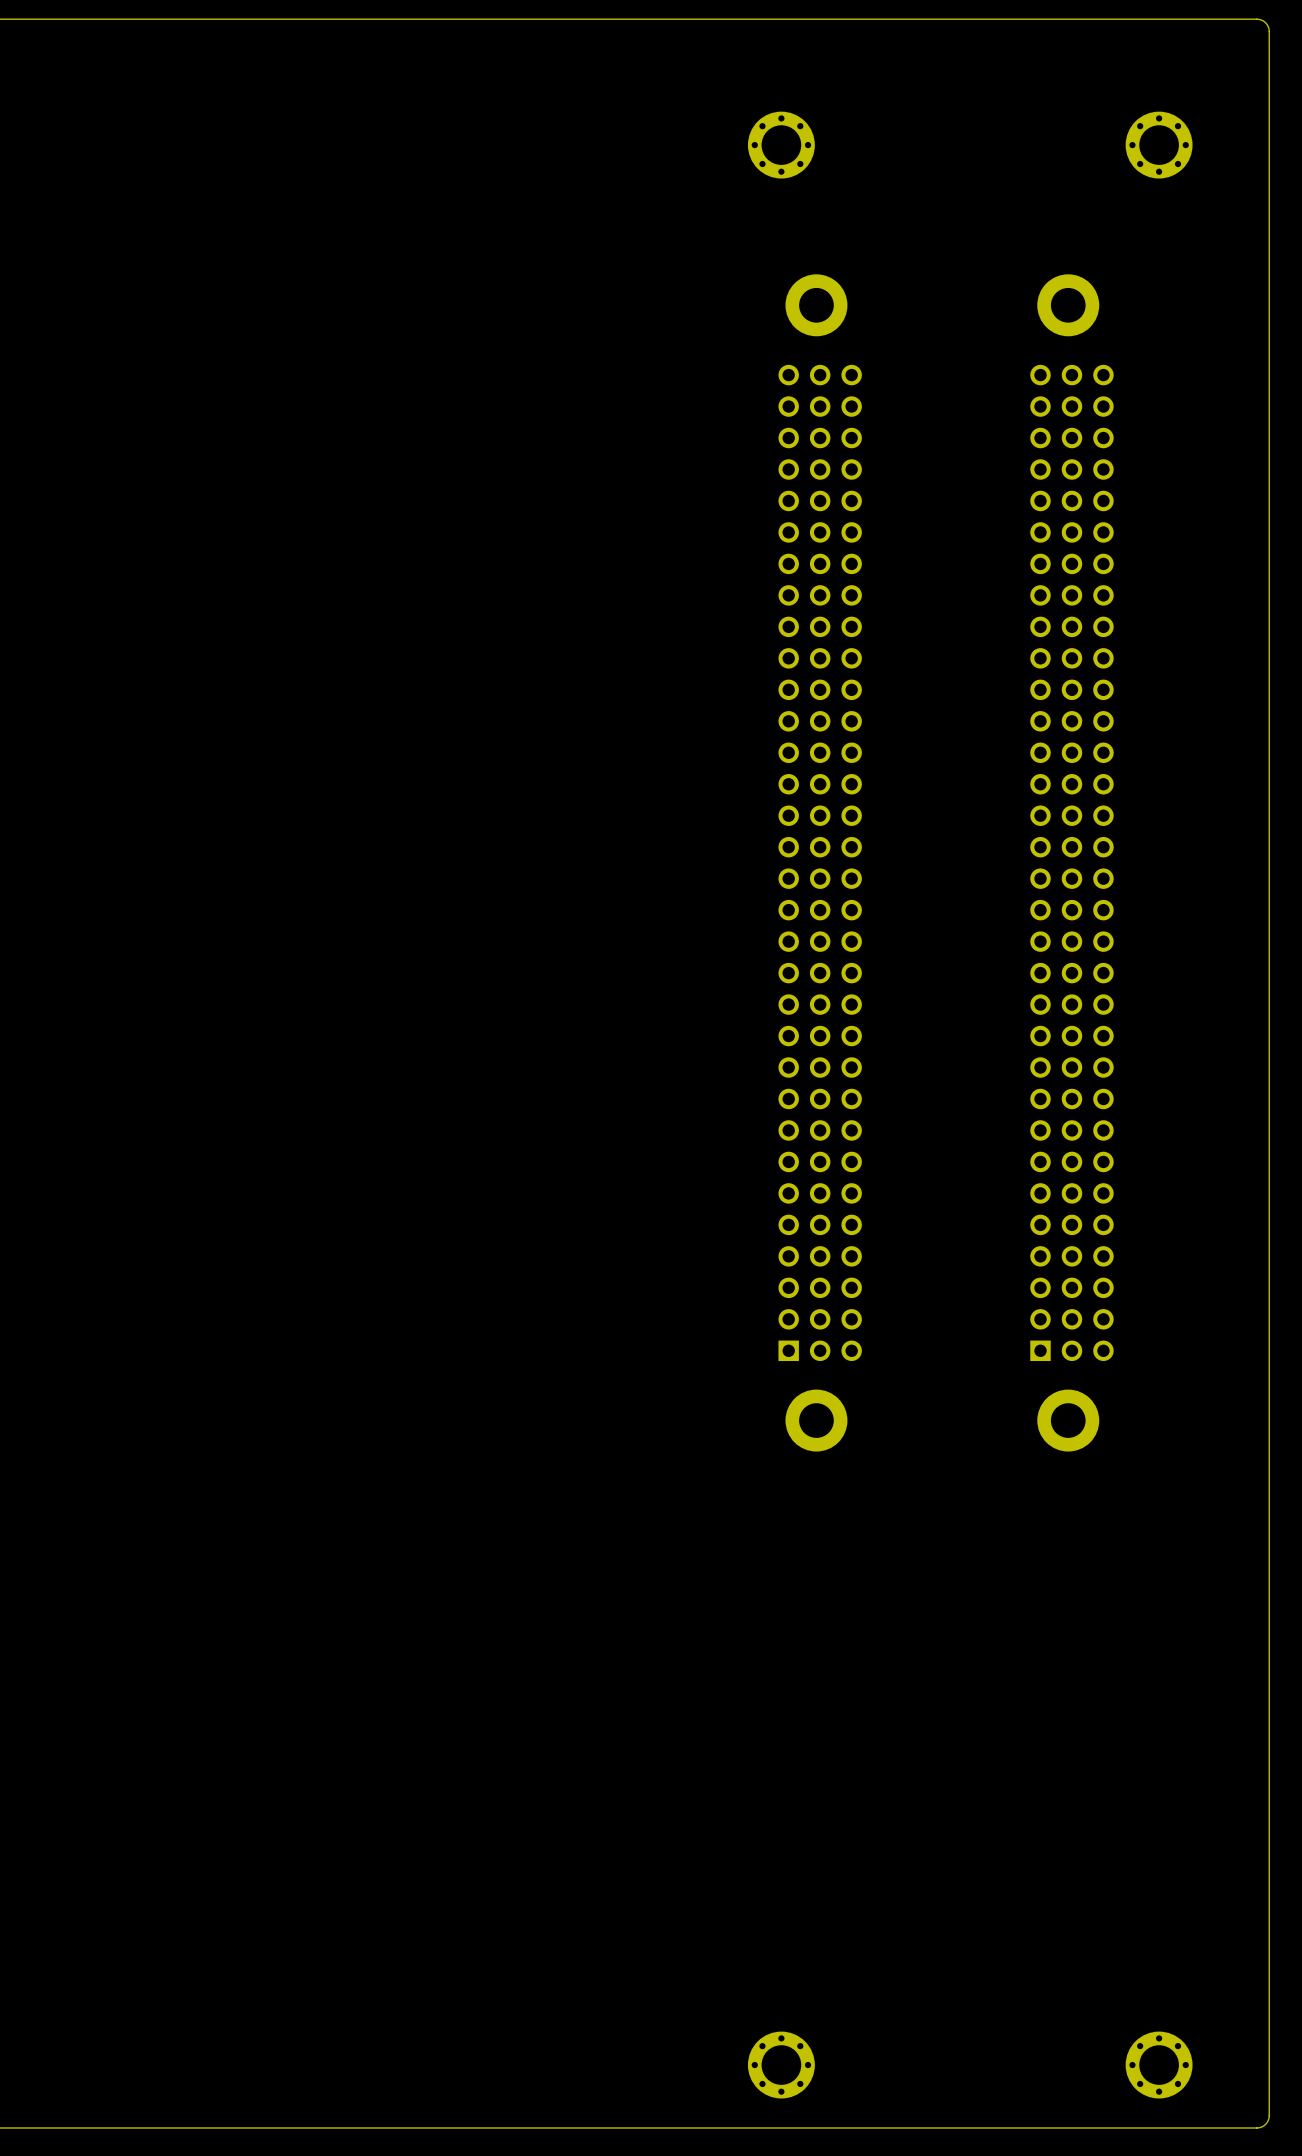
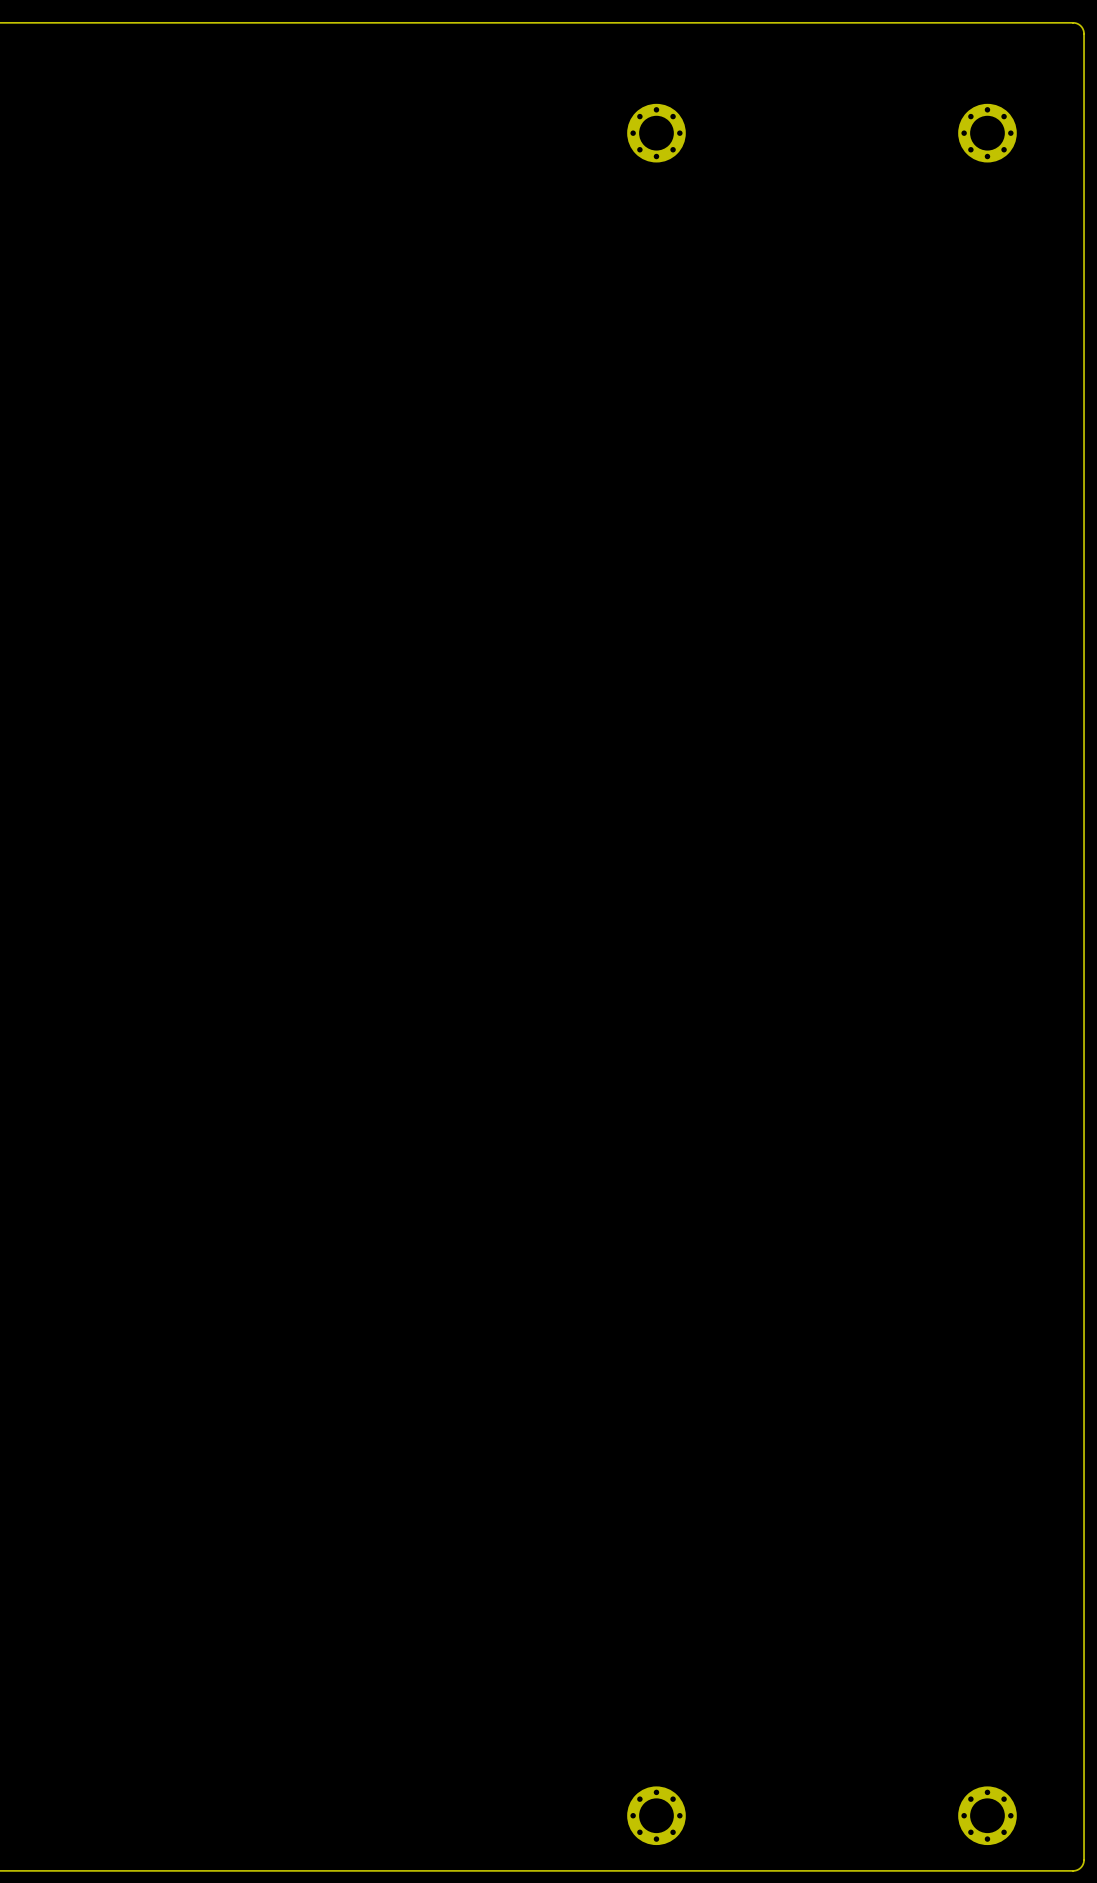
part: (820, 862) -> none
part: (1071, 862) -> none

